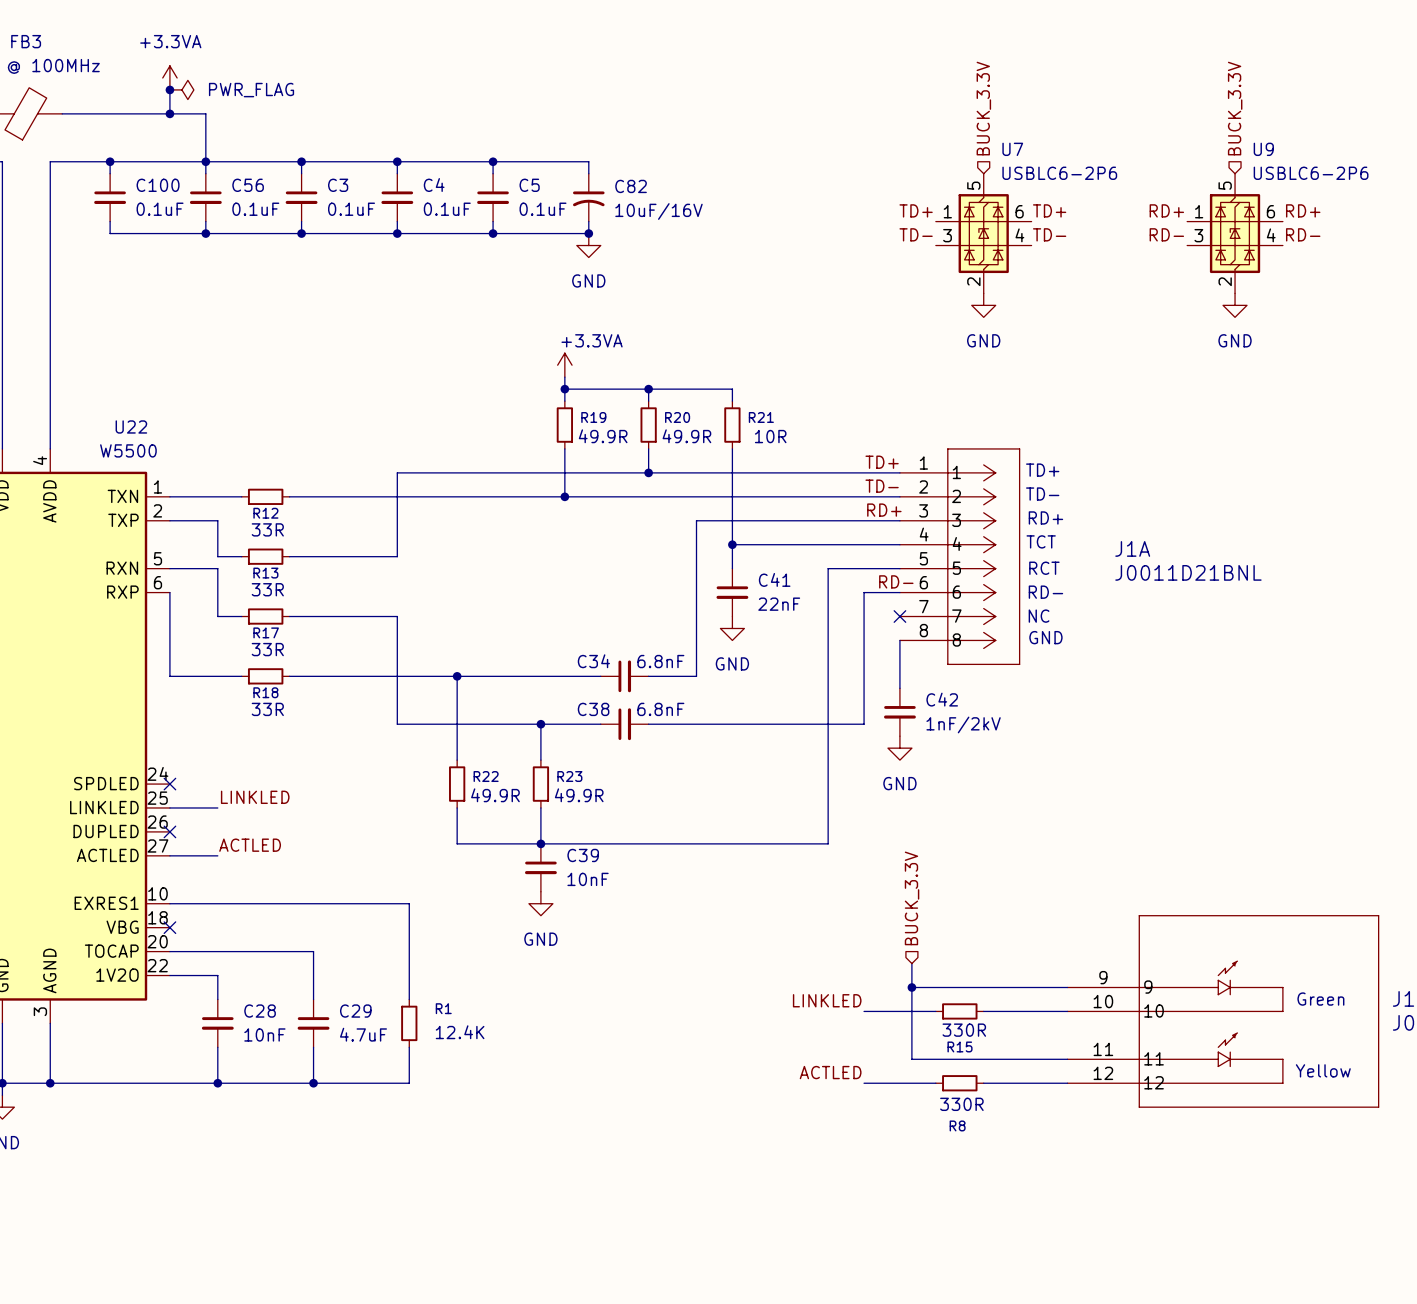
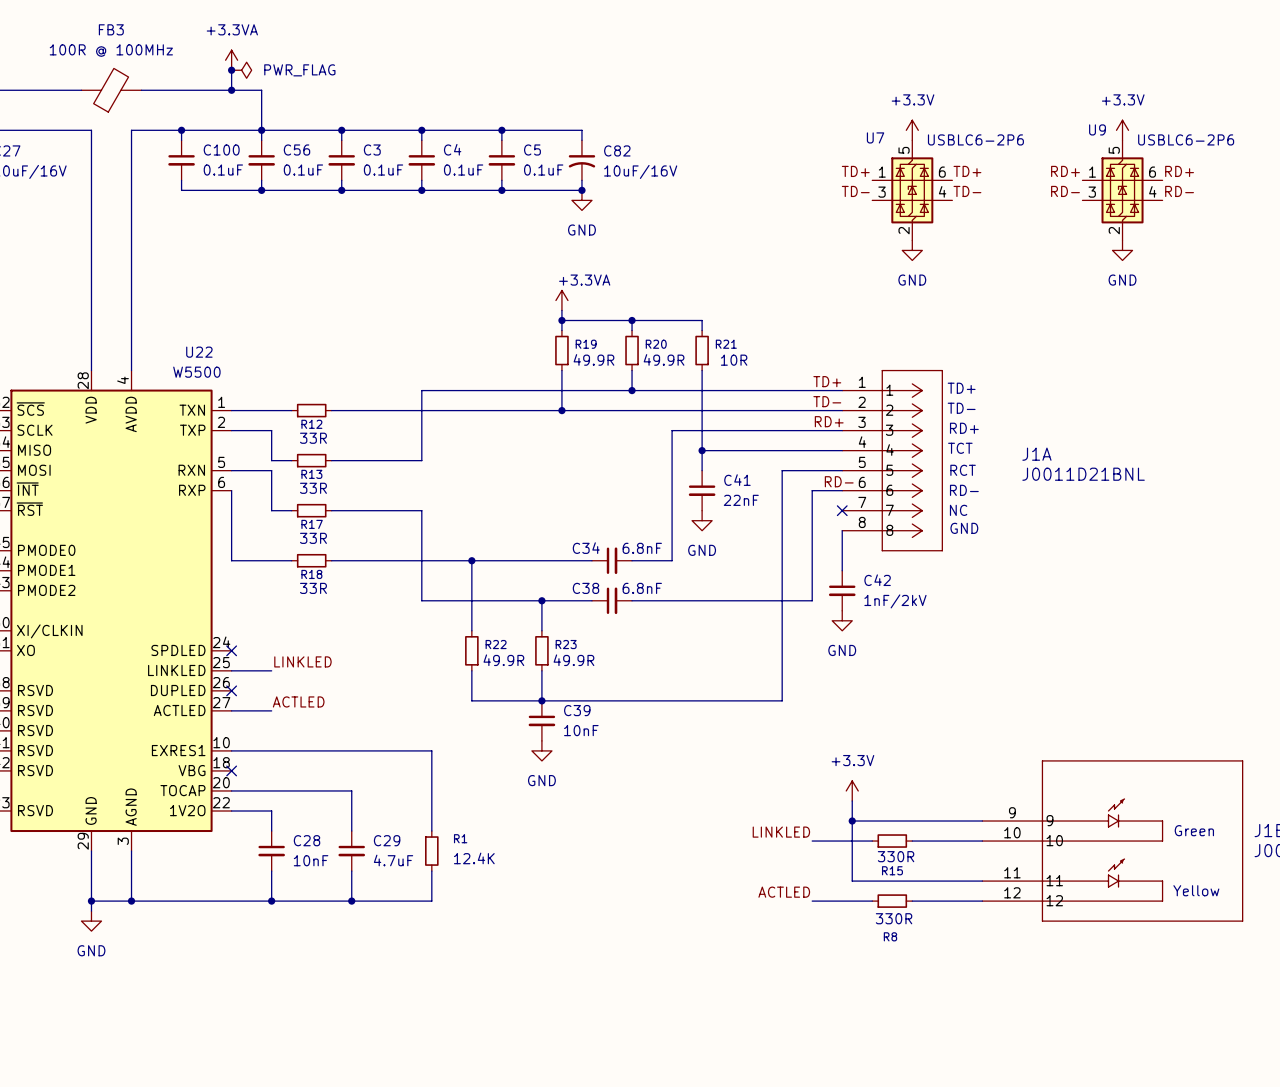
hierarchical label: BUCK_3.3V (983, 108) -> none
hierarchical label: BUCK_3.3V (1235, 108) -> none
U7 name position: U7 (1012, 149) -> U7 (875, 137)
U9 name position: U9 (1263, 149) -> U9 (1097, 129)
power symbol: none -> +3.3V (912, 130)
power symbol: none -> +3.3V (1122, 130)
hierarchical label: BUCK_3.3V (912, 898) -> none
power symbol: none -> +3.3V (852, 790)

